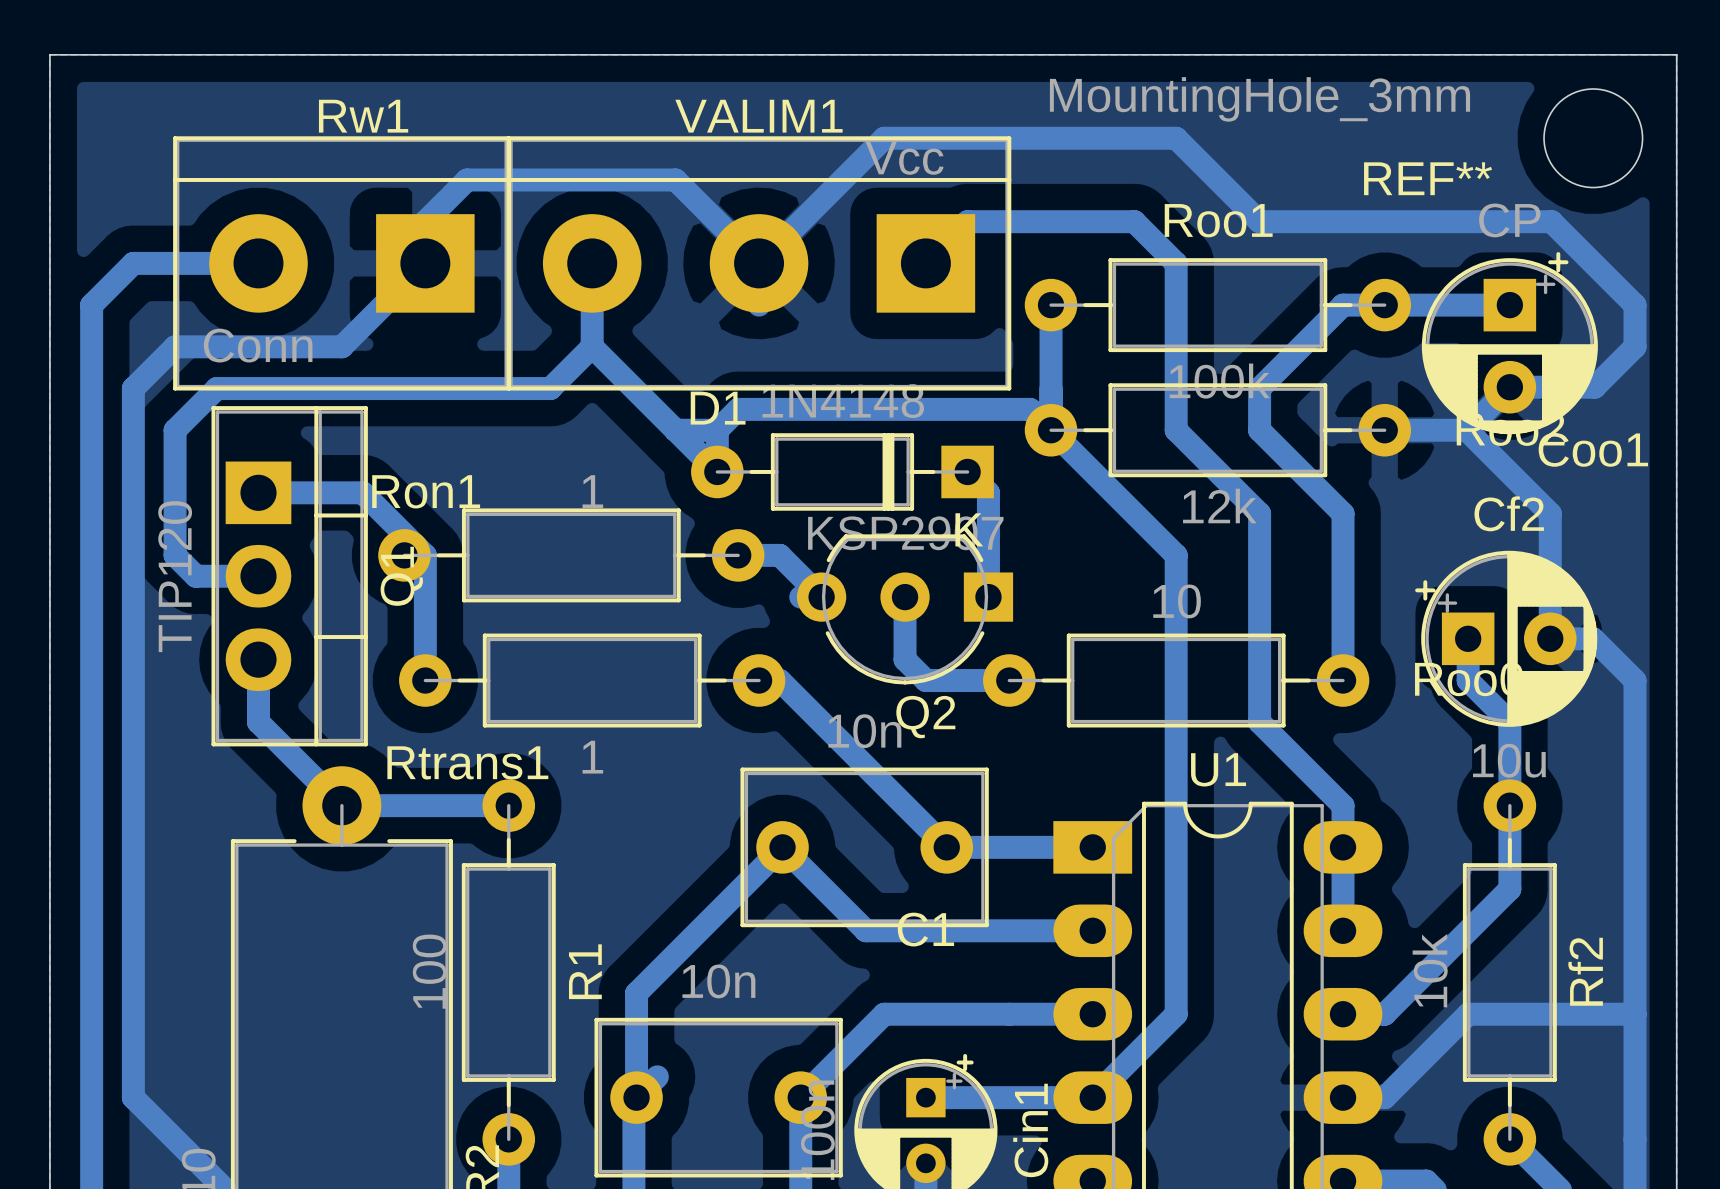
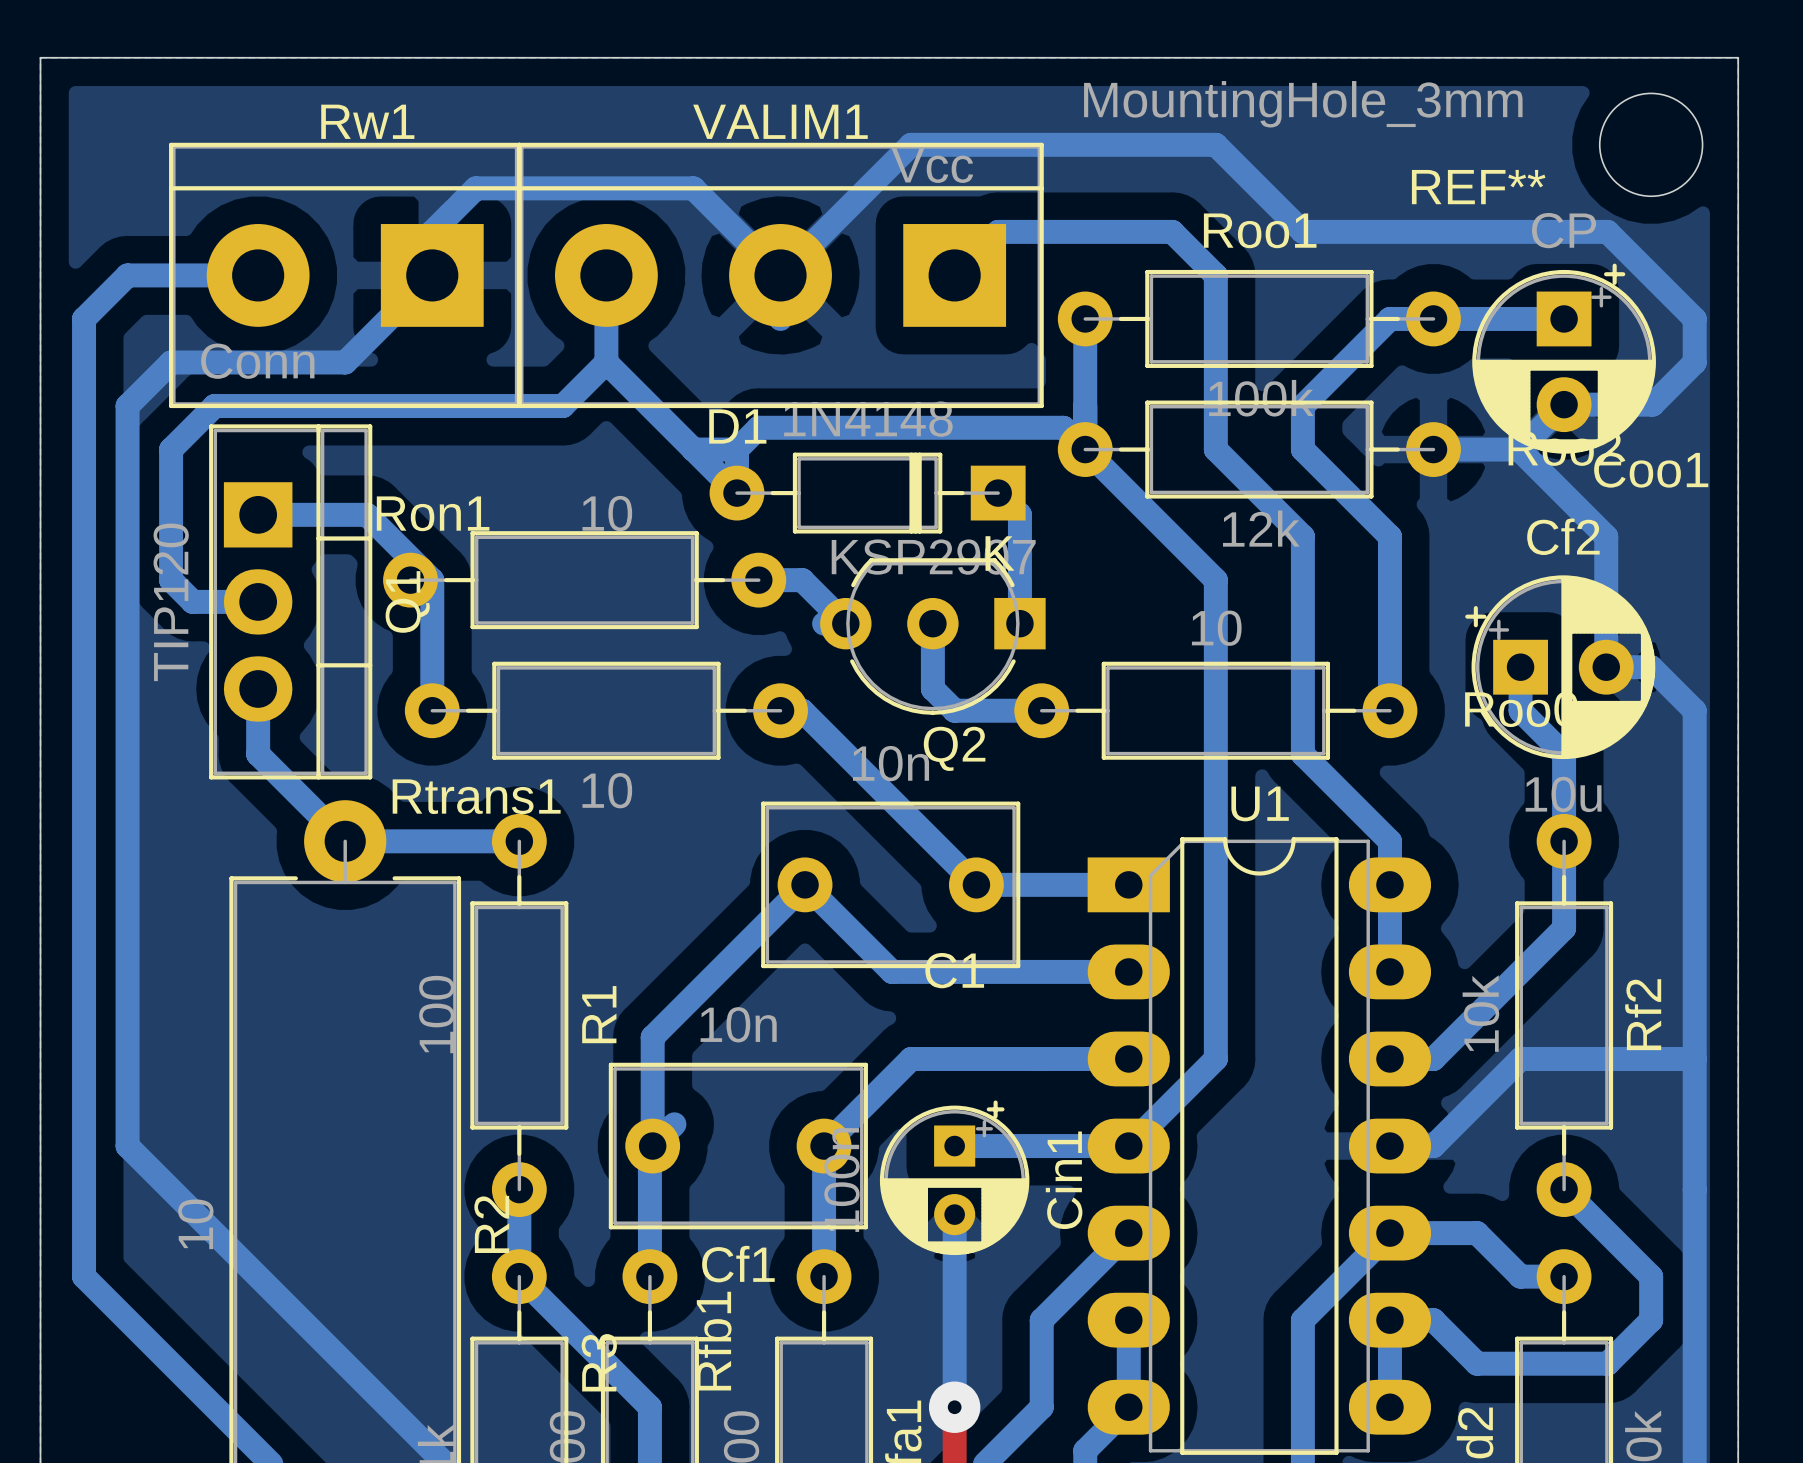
Ron1 value: 1 (592, 491) -> 10 (607, 513)
Rtrans1 value: 1 (592, 757) -> 10 (607, 790)

